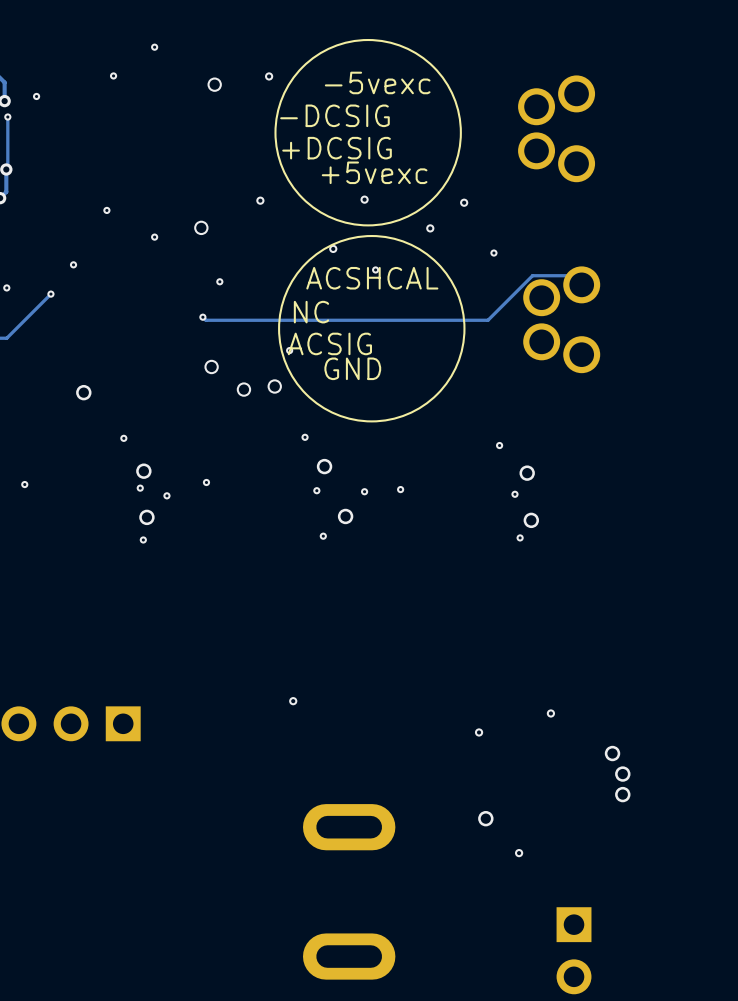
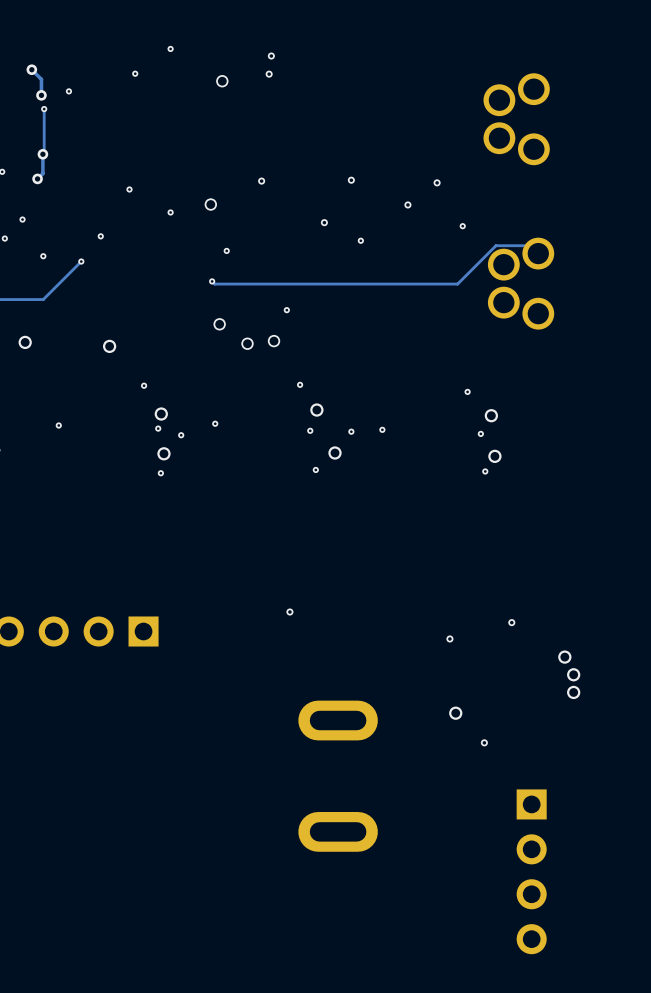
drawing: [274, 38, 466, 423] -> none
via: none -> (271, 56)
text: -5vexc (377, 82) -> none
text: -DCSIG (334, 115) -> none
text: +DCSIG (337, 148) -> none
text: +5vexc (374, 172) -> none
text: ACSHCAL (372, 278) -> none
text: NC (311, 312) -> none
text: ACSIG (329, 343) -> none
text: GND (352, 368) -> none

